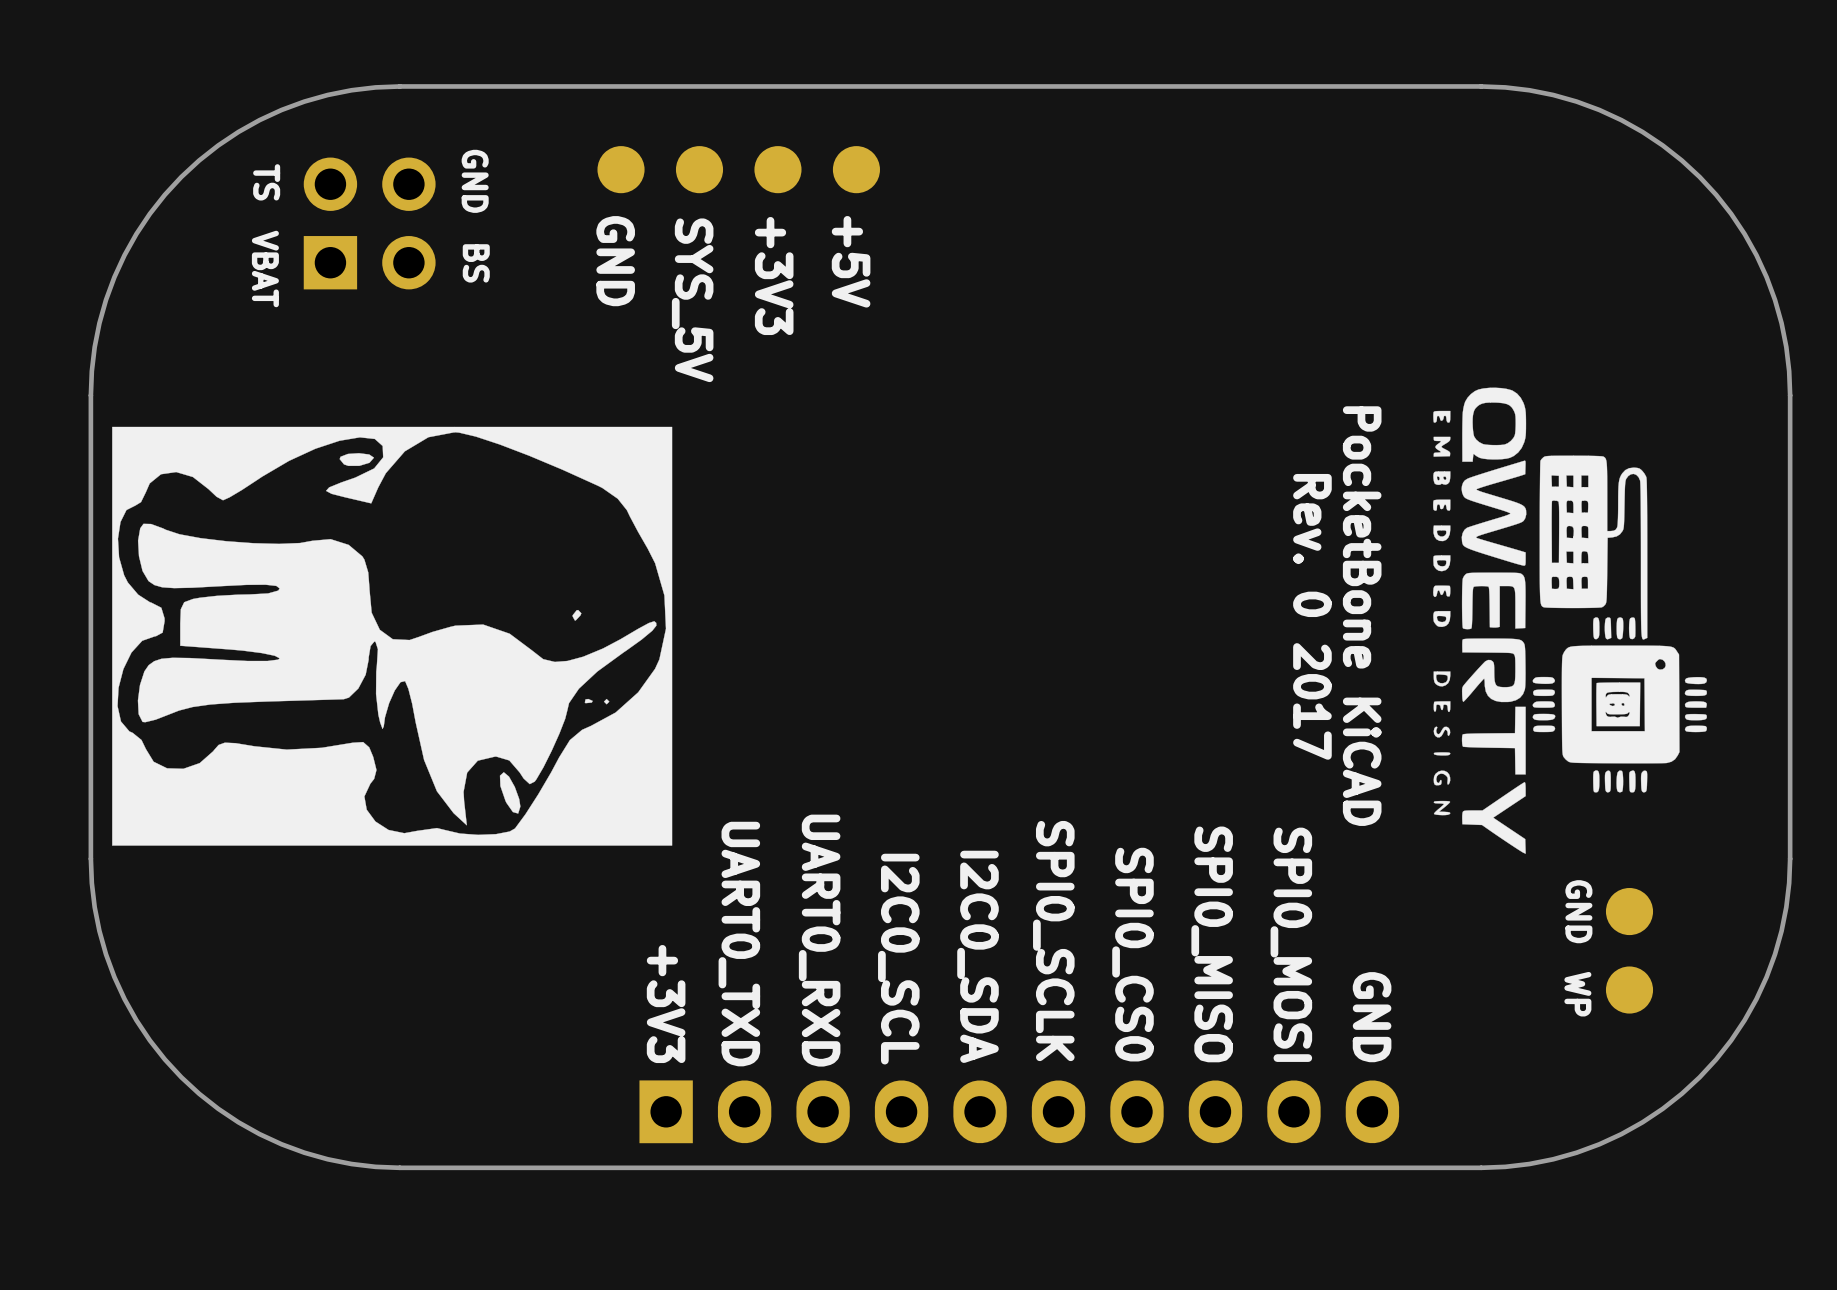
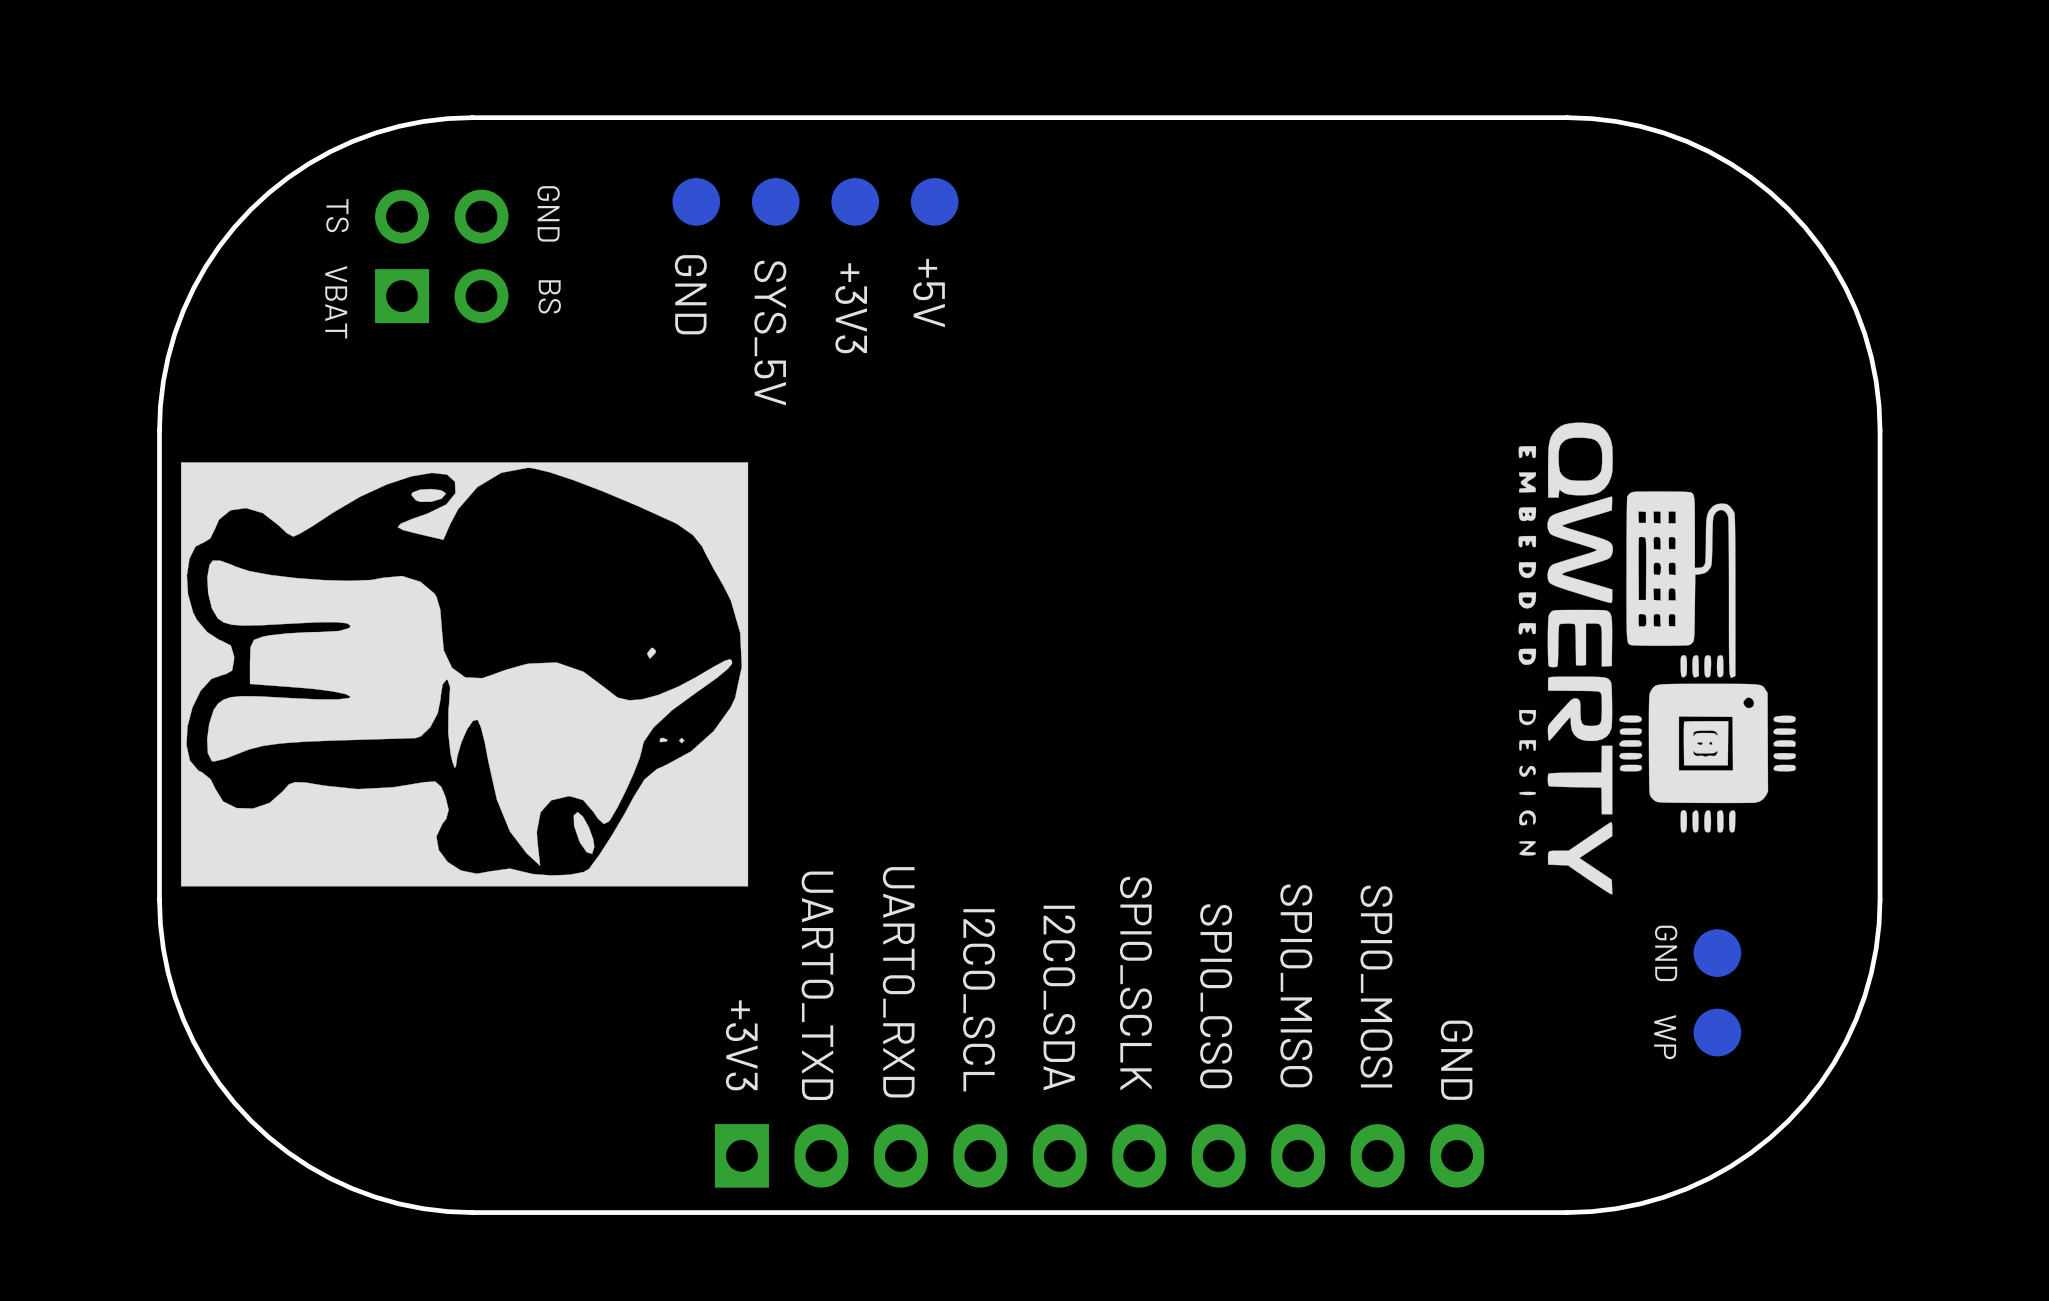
text: Rev. 0 2017 (1312, 616) -> none
text: PocketBone KiCAD (1362, 616) -> none

